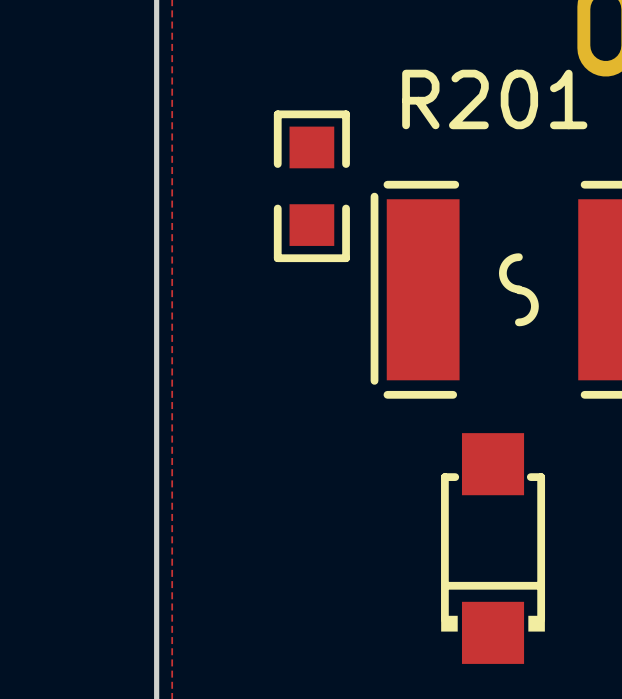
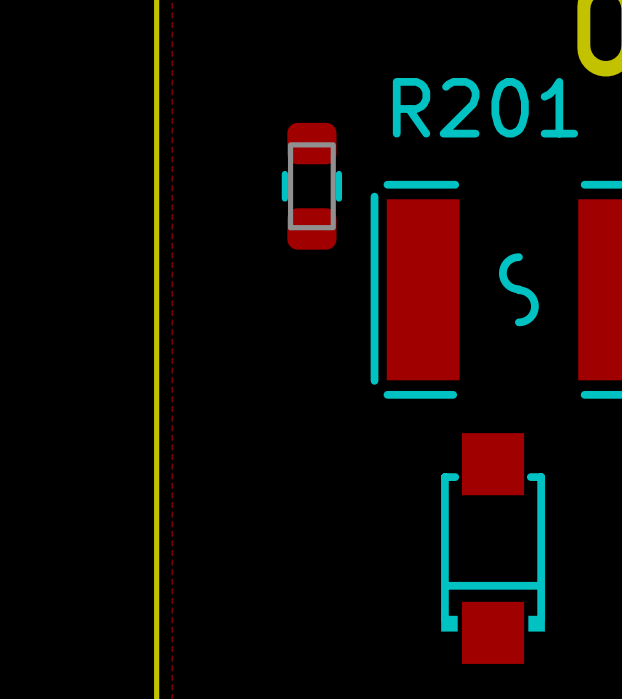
R201 footprint: [273, 110, 350, 263] -> [281, 122, 343, 250]

